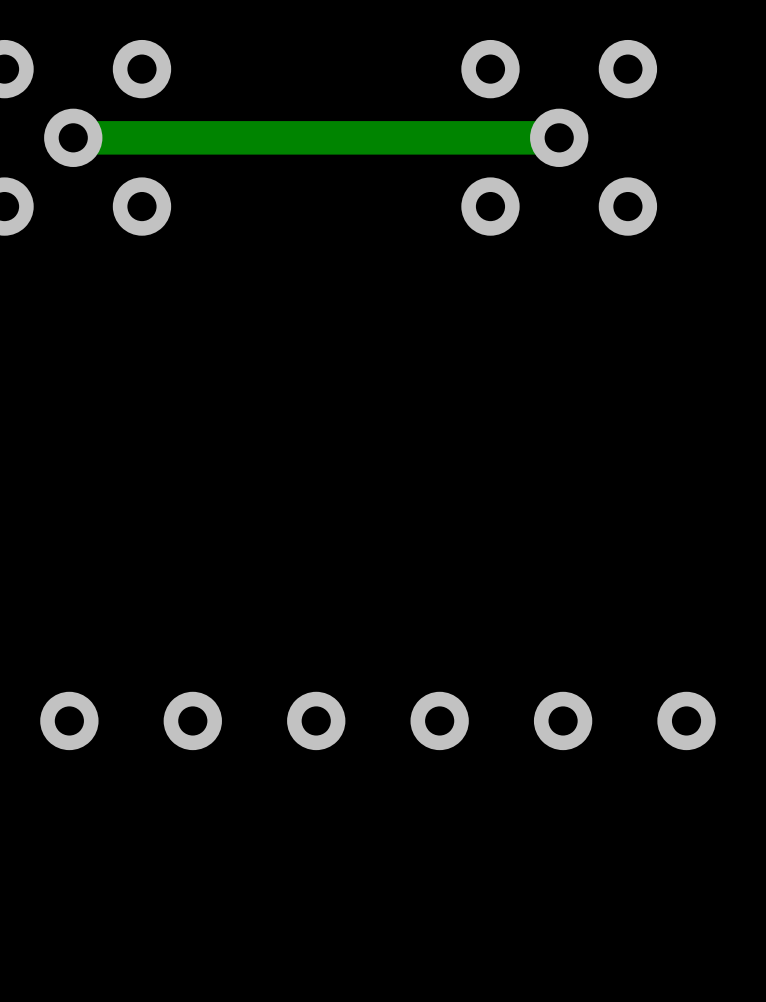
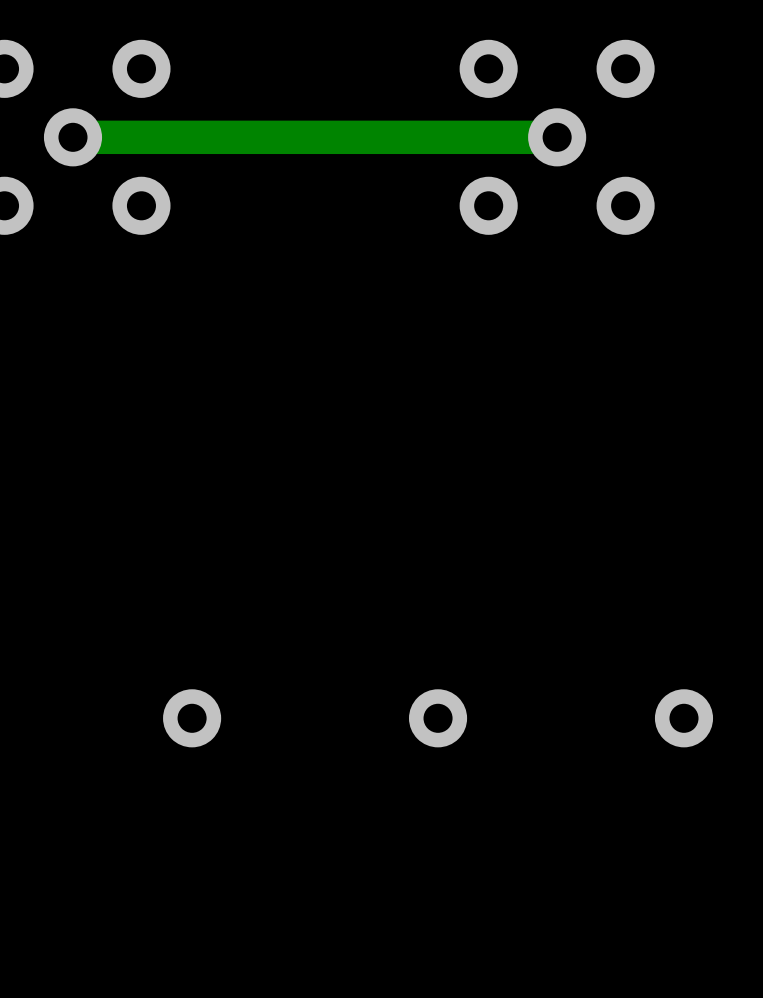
via: (69, 720) -> none
via: (316, 720) -> none
via: (563, 720) -> none

